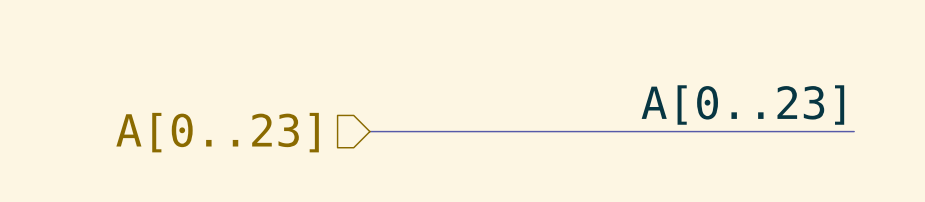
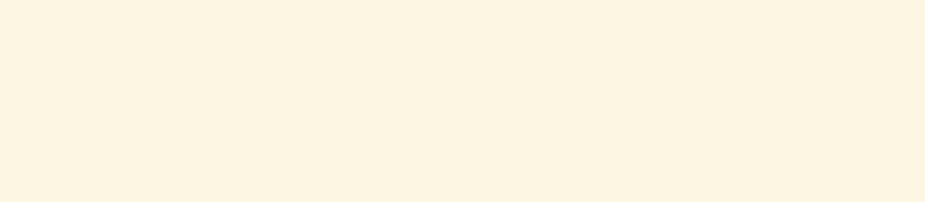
label: A[0..23] (742, 105) -> none
bus: (369, 131) (854, 131) -> none
hierarchical label: A[0..23] (217, 132) -> none

